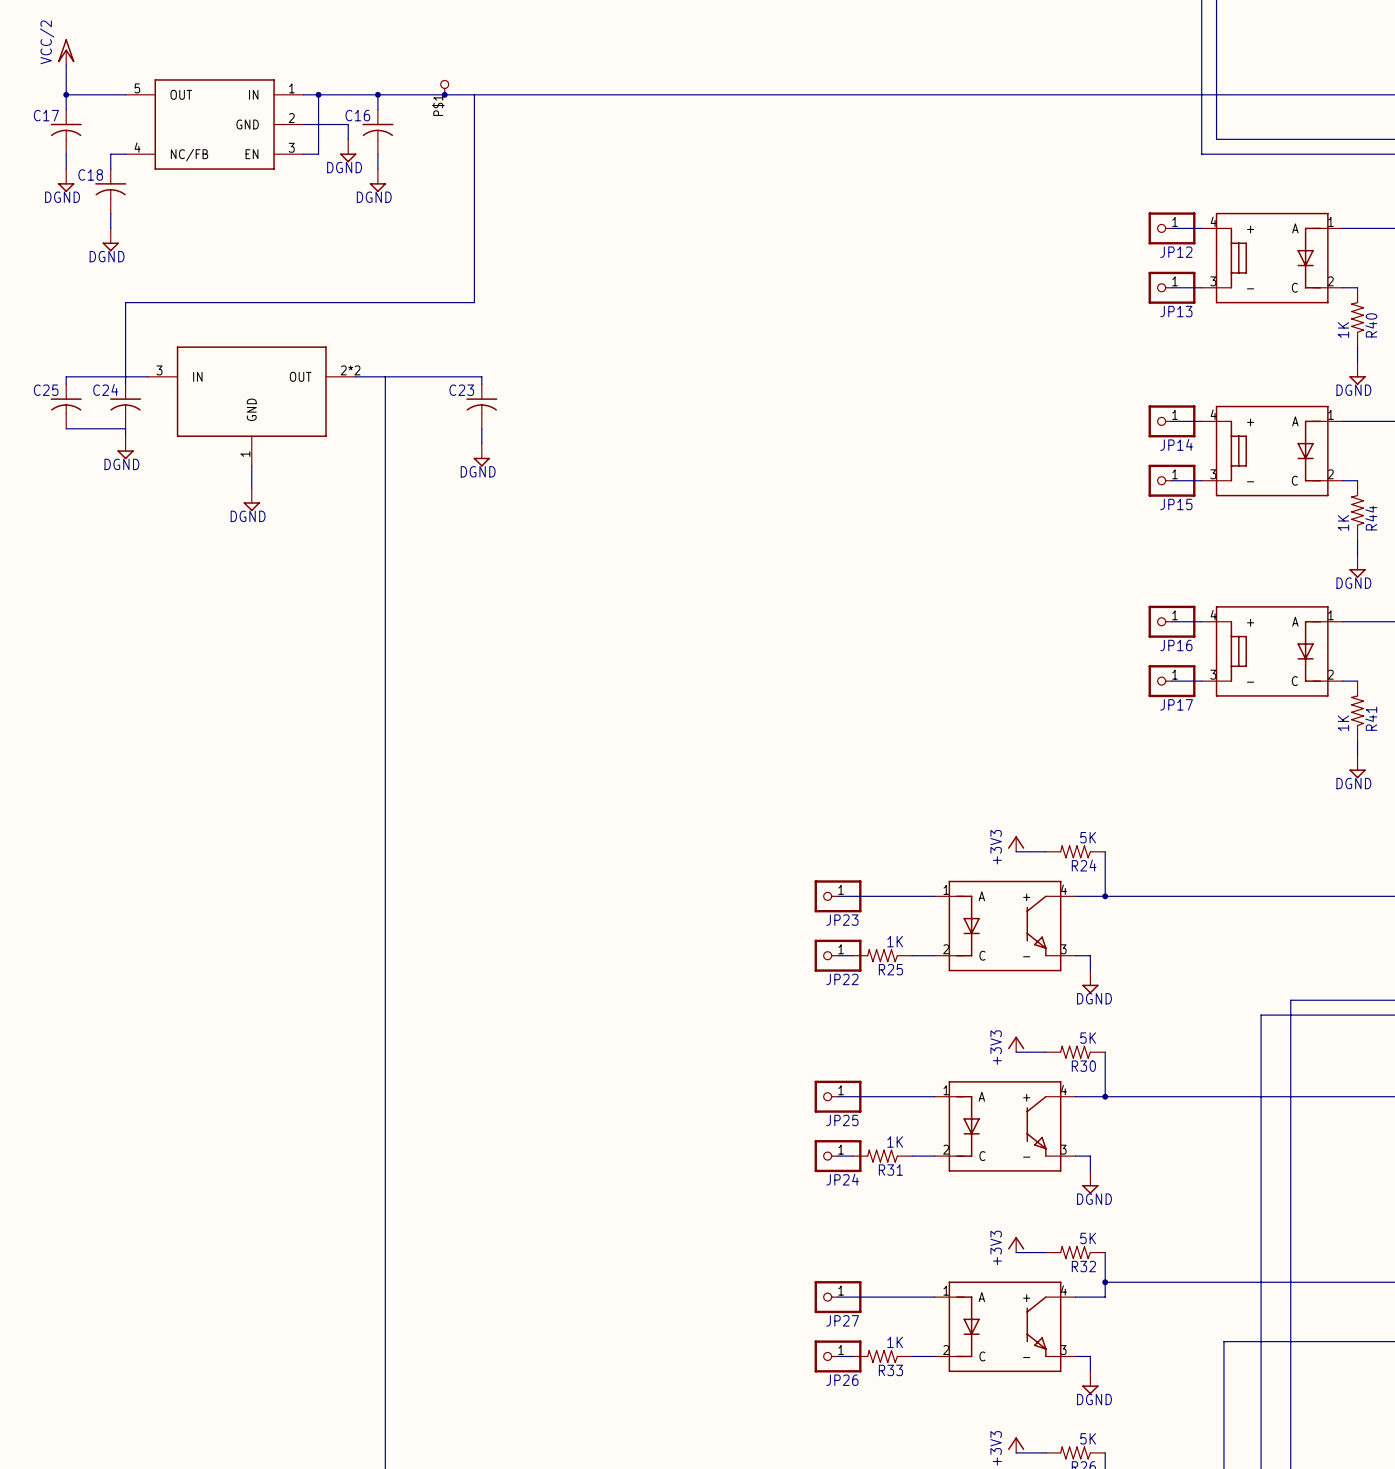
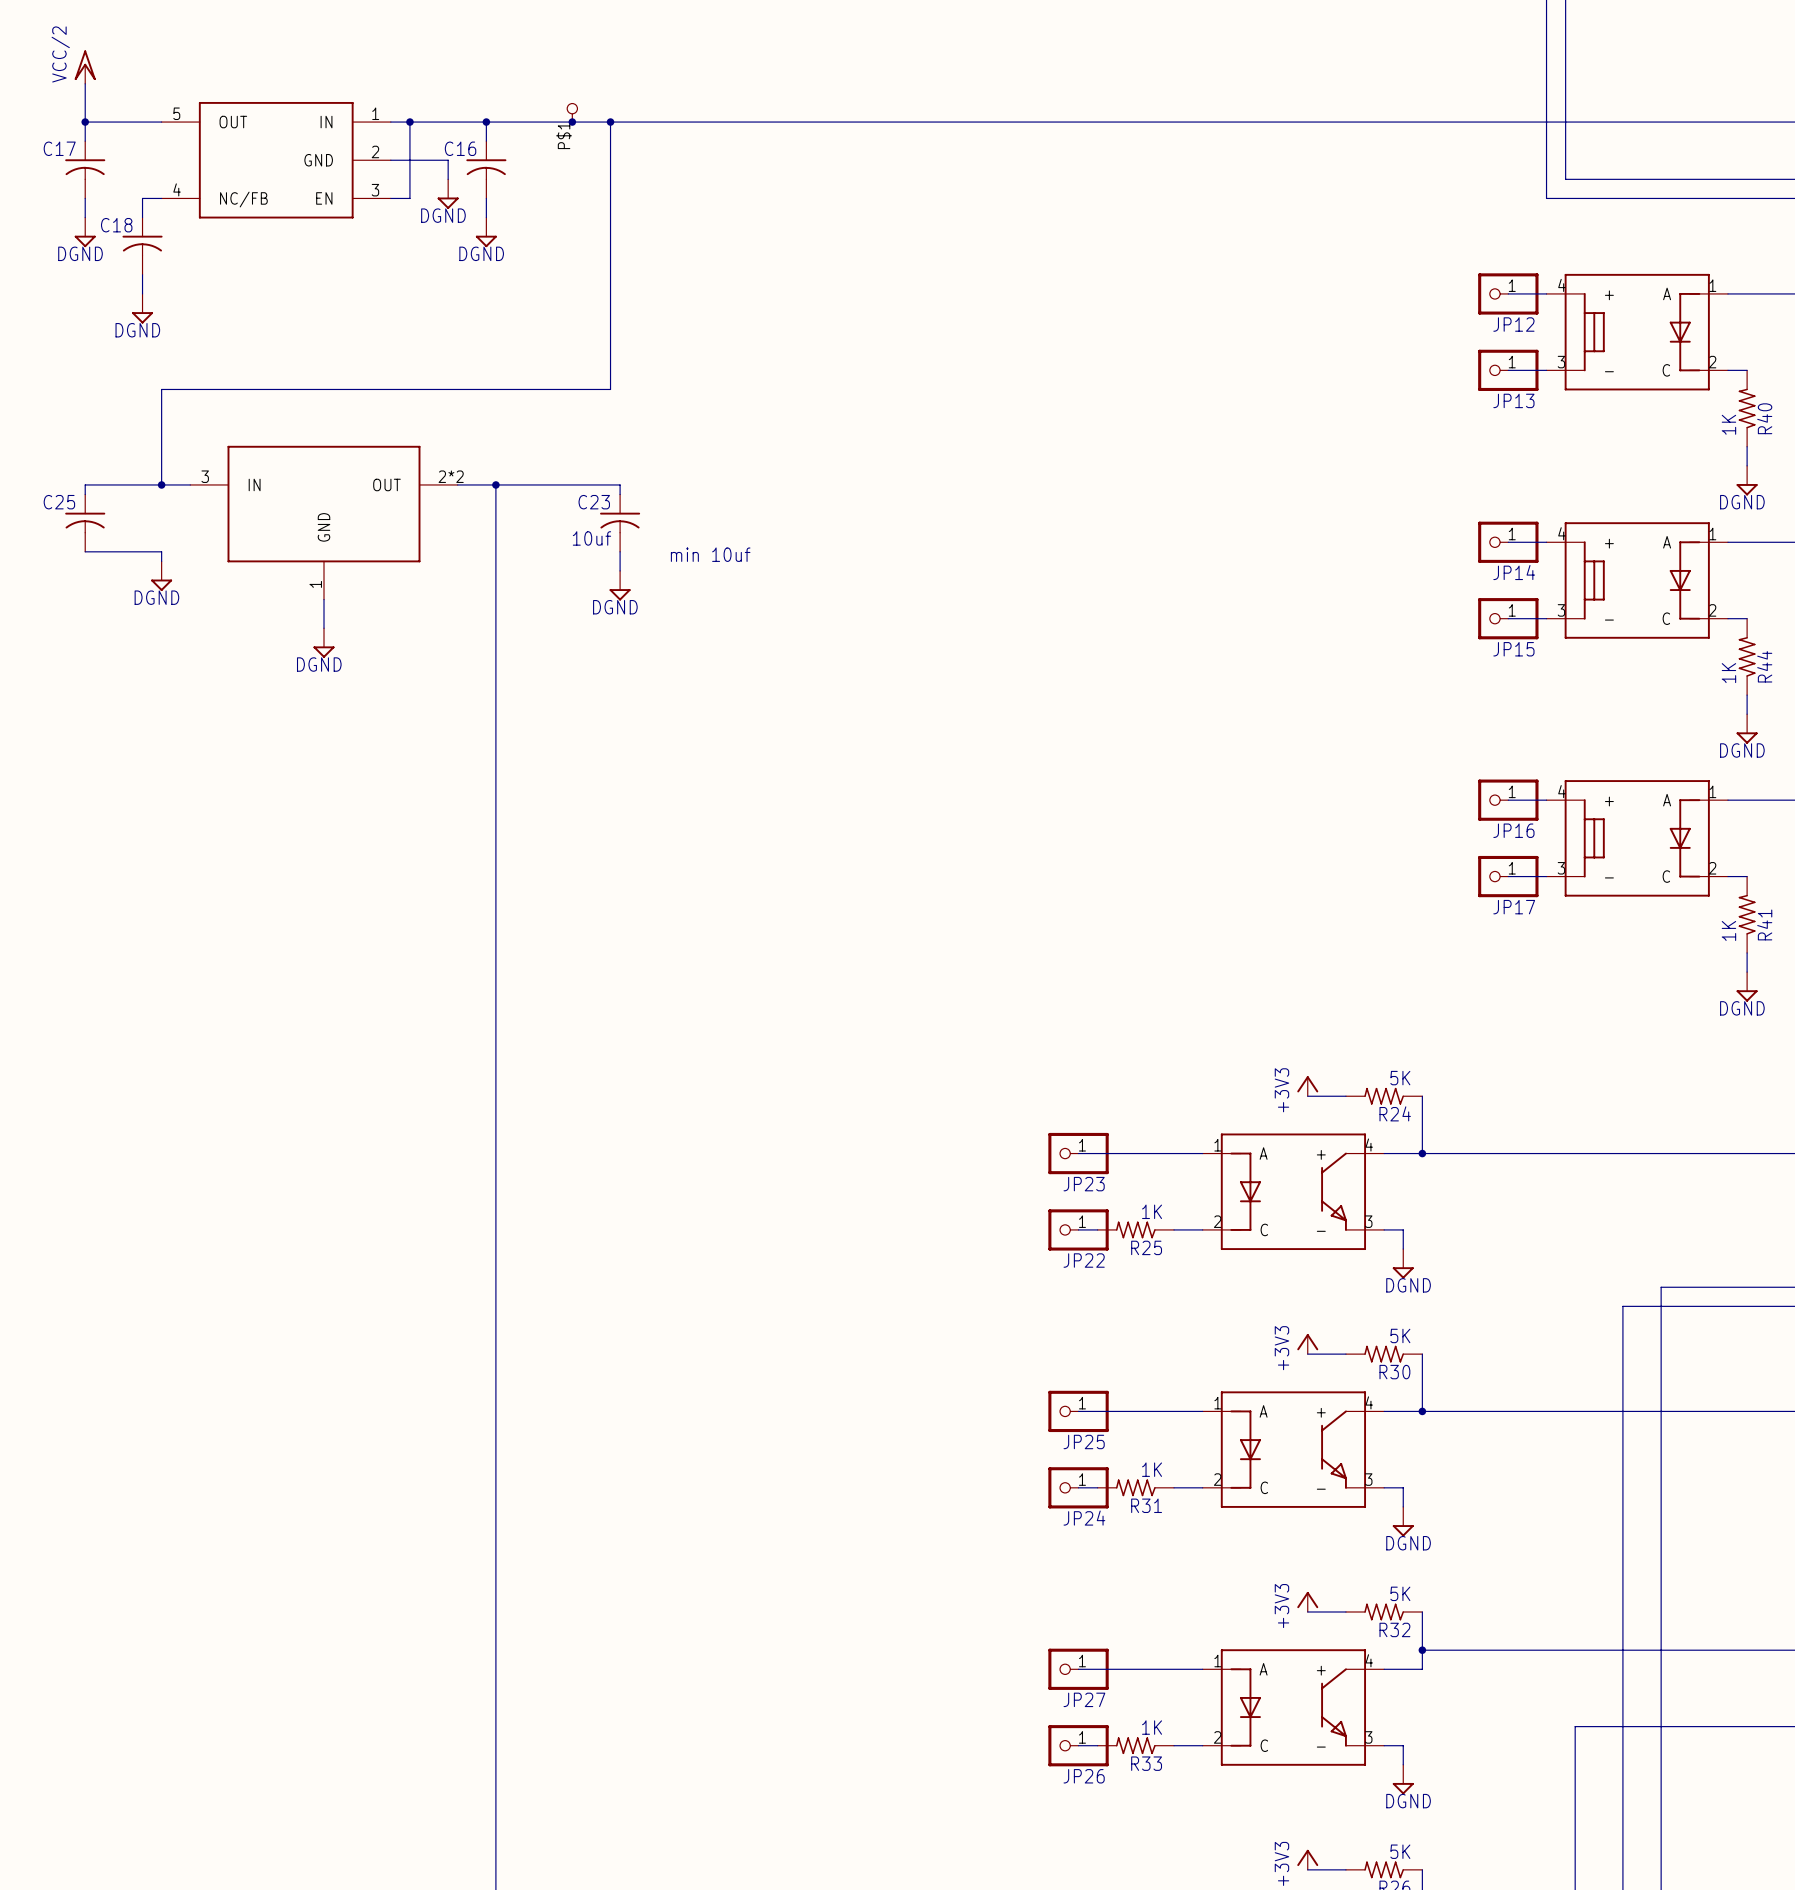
junction: none -> (610, 122)
wire: (125, 376) (125, 384) -> none
junction: none -> (161, 484)
junction: none -> (495, 484)
C24: (125, 406) -> none
C23 value: none -> 10uf (591, 538)
text: none -> min 10uf (710, 554)

